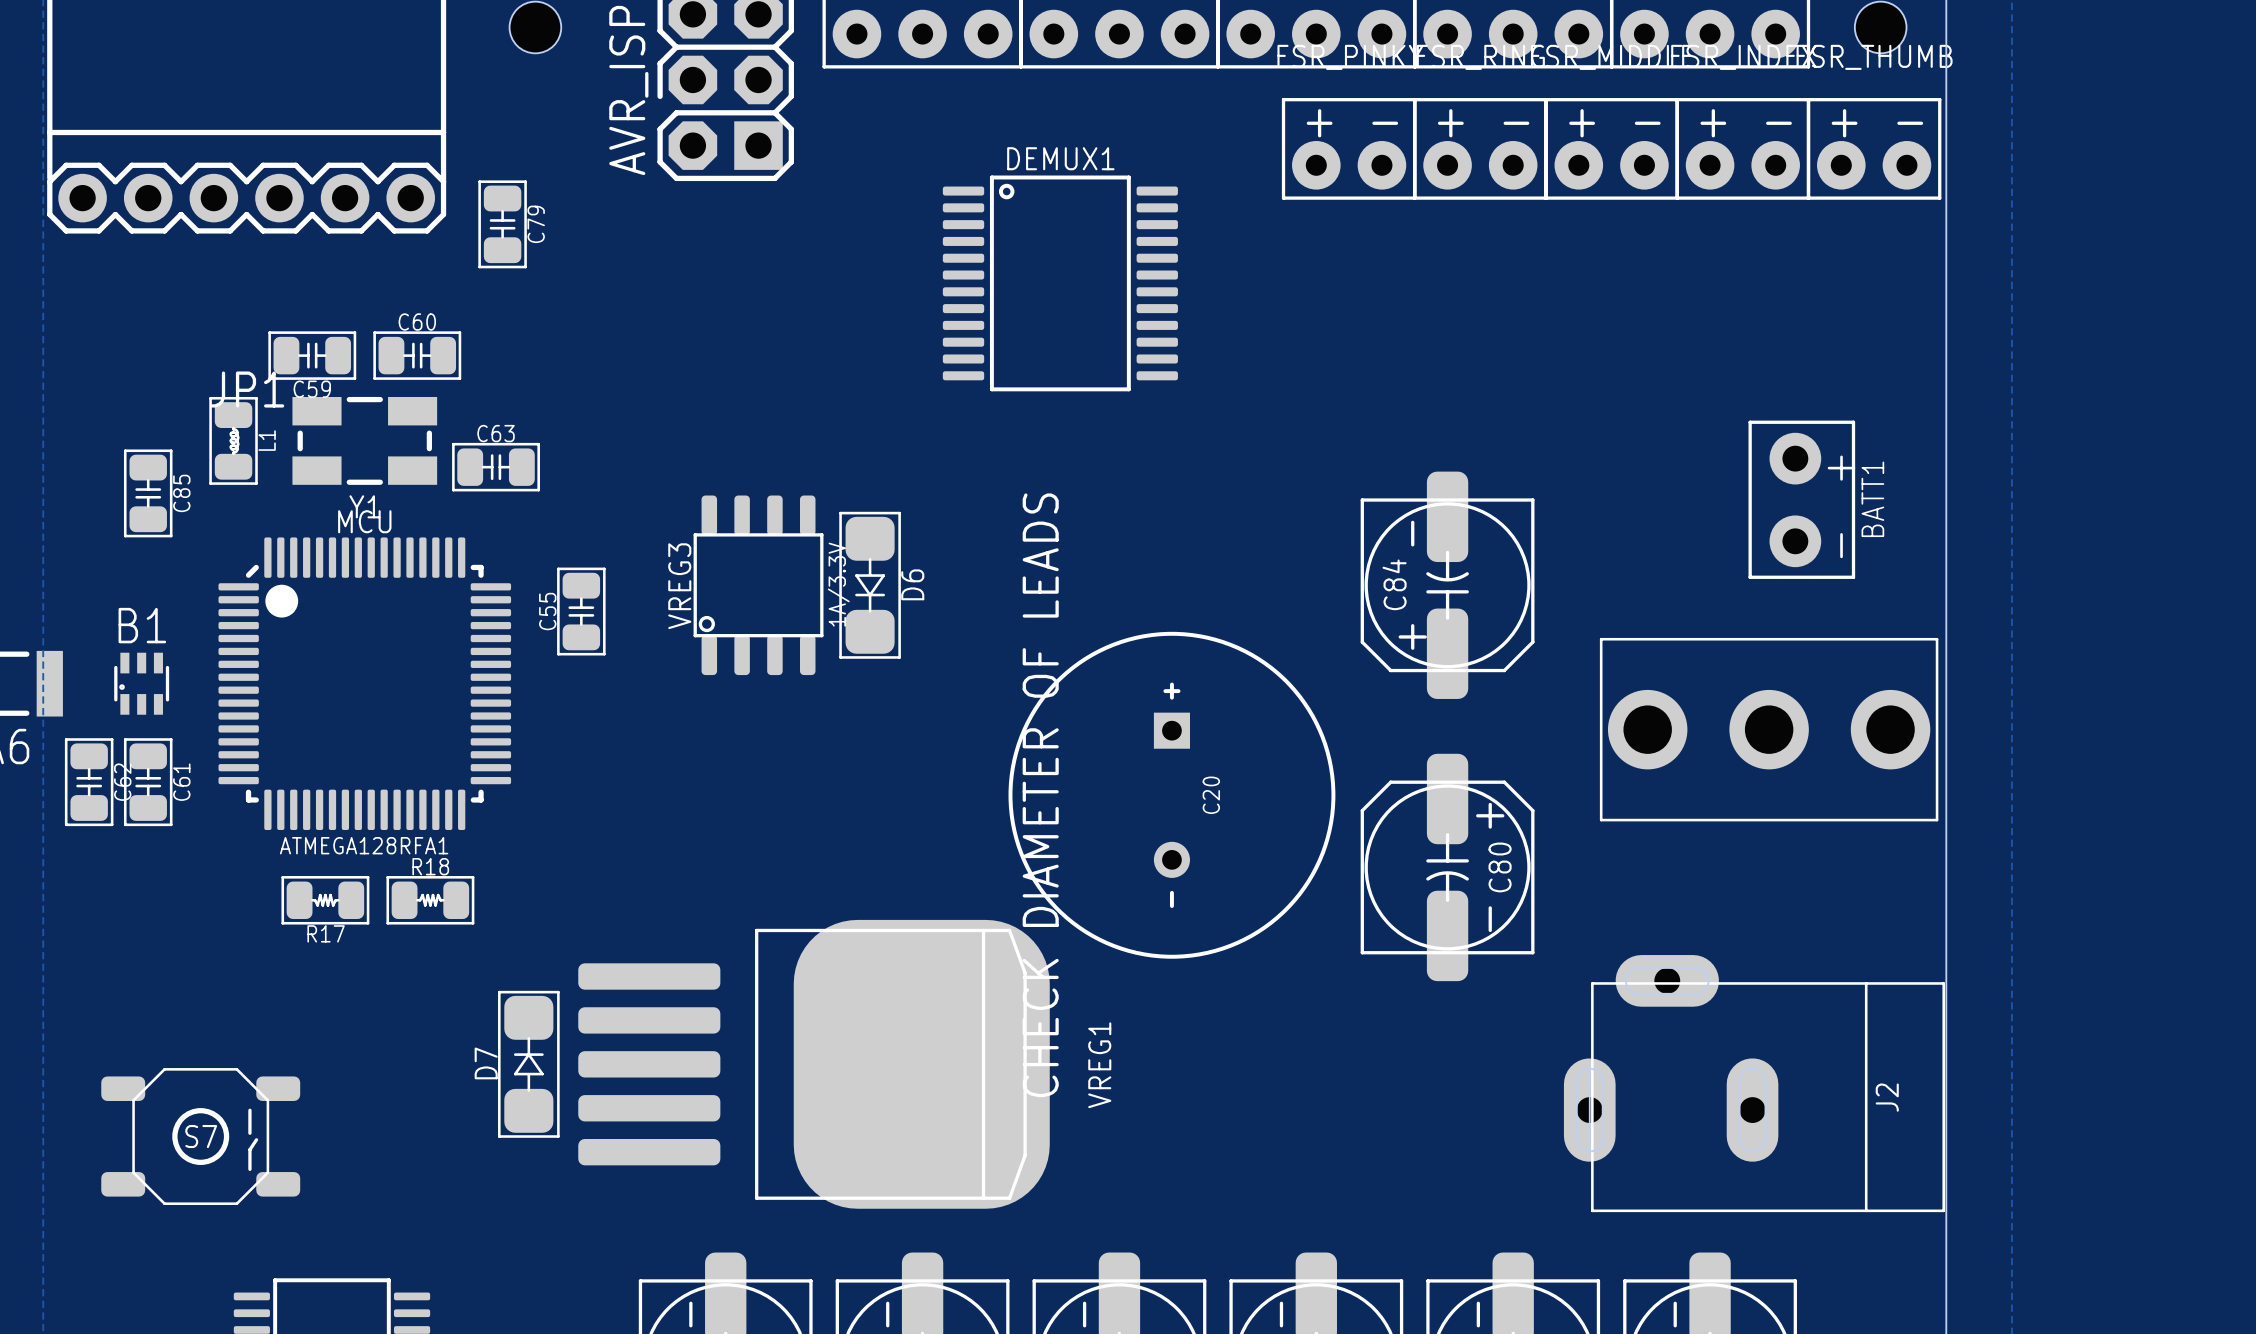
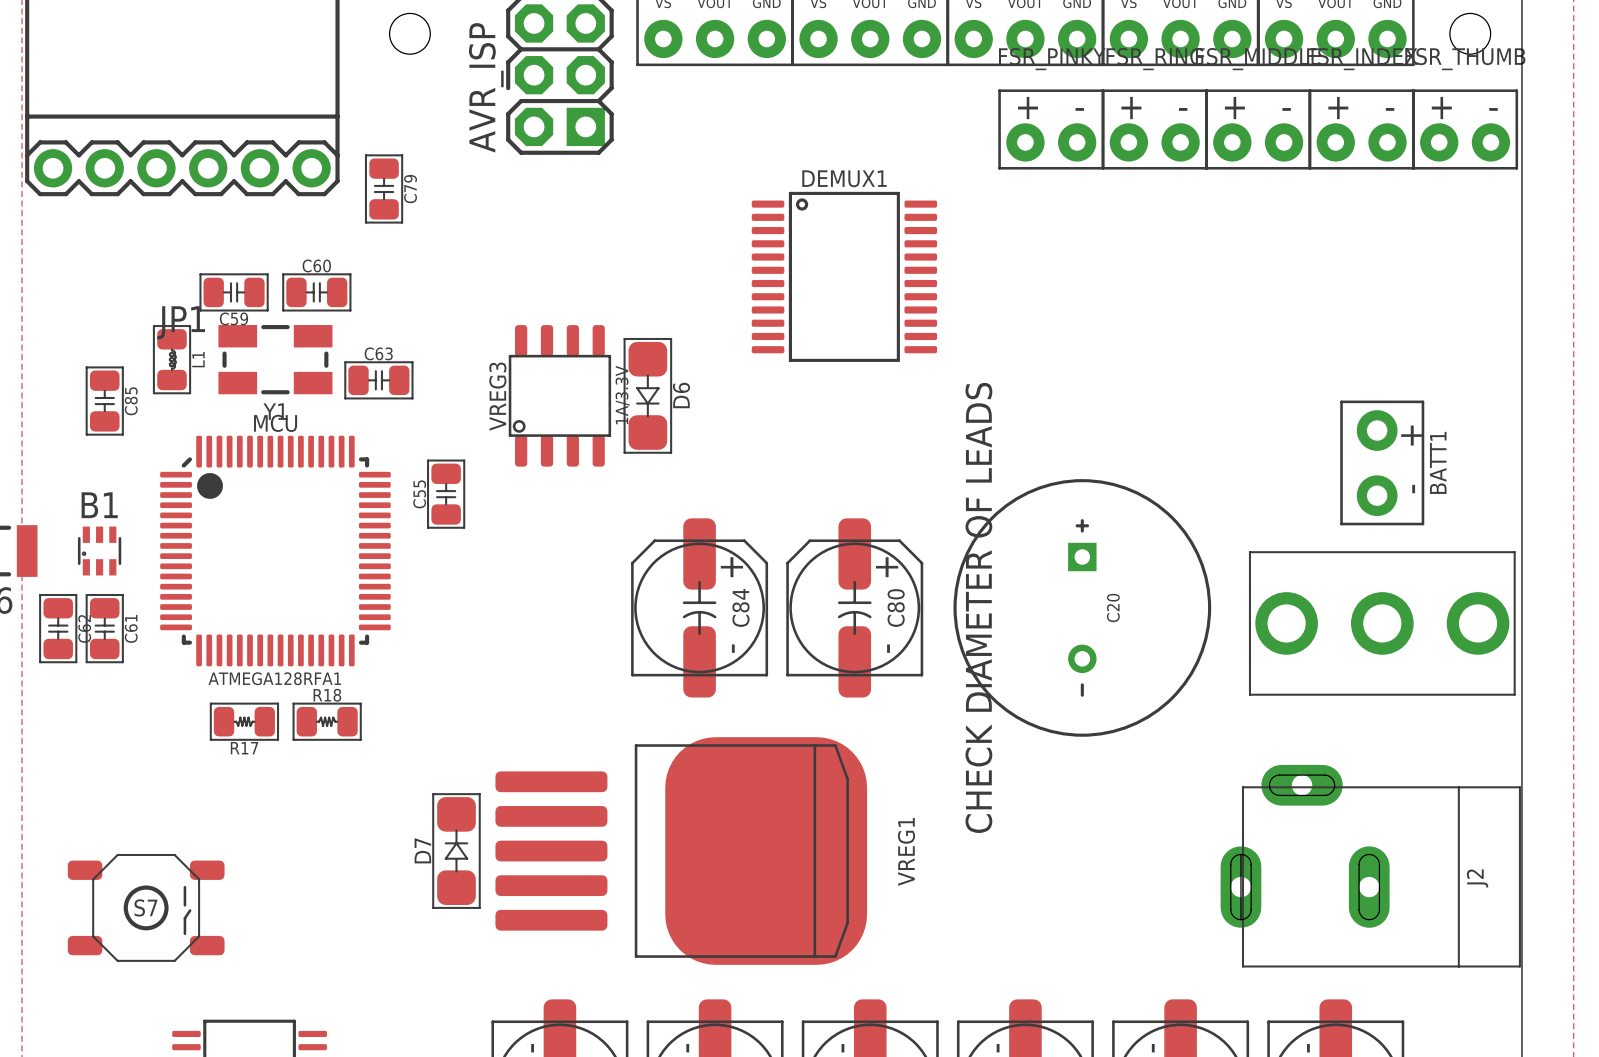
DEMUX1 position: (1060, 283) -> (844, 276)
C84 footprint: [1360, 471, 1535, 699] -> [631, 518, 769, 698]
BATT1 position: (1801, 499) -> (1382, 462)
C84 name position: C84 (1394, 584) -> C84 (740, 607)
VREG3 position: (758, 585) -> (559, 395)
D6 position: (870, 585) -> (647, 395)
part position: (1769, 729) -> (1382, 623)
C20 position: (1171, 795) -> (1082, 607)
C80 position: (1447, 867) -> (854, 607)
D7 position: (528, 1064) -> (456, 851)
VREG1 position: (814, 1064) -> (681, 851)

